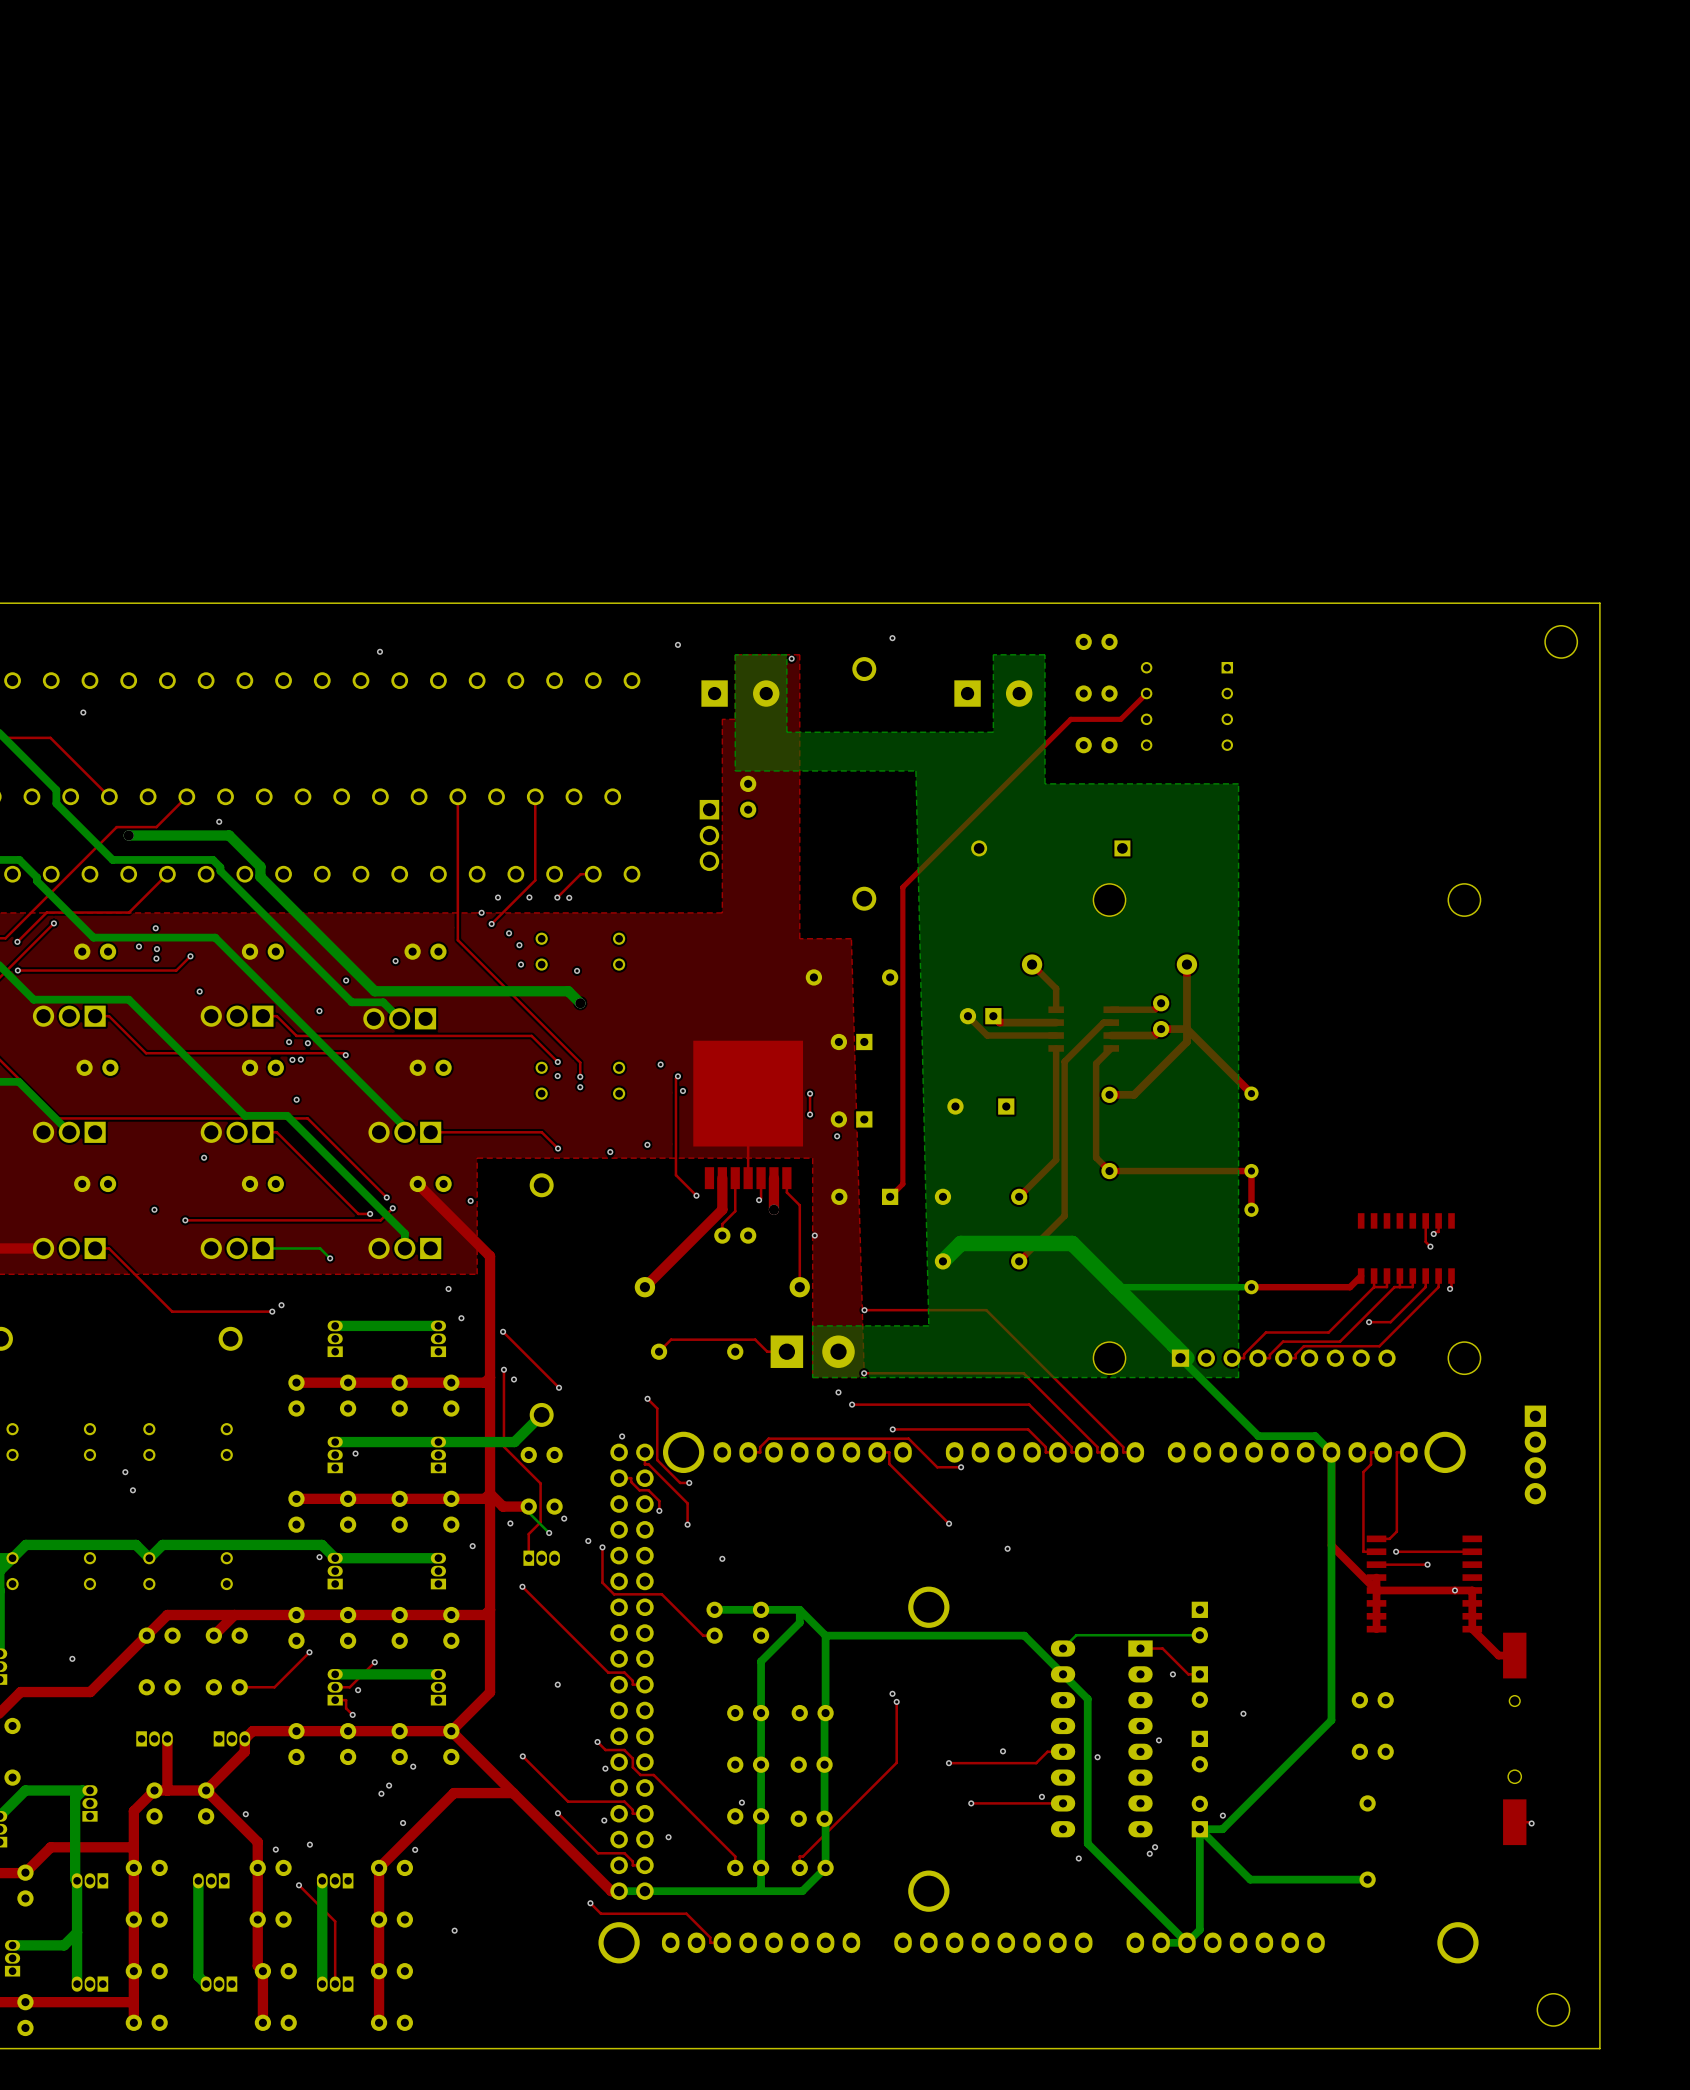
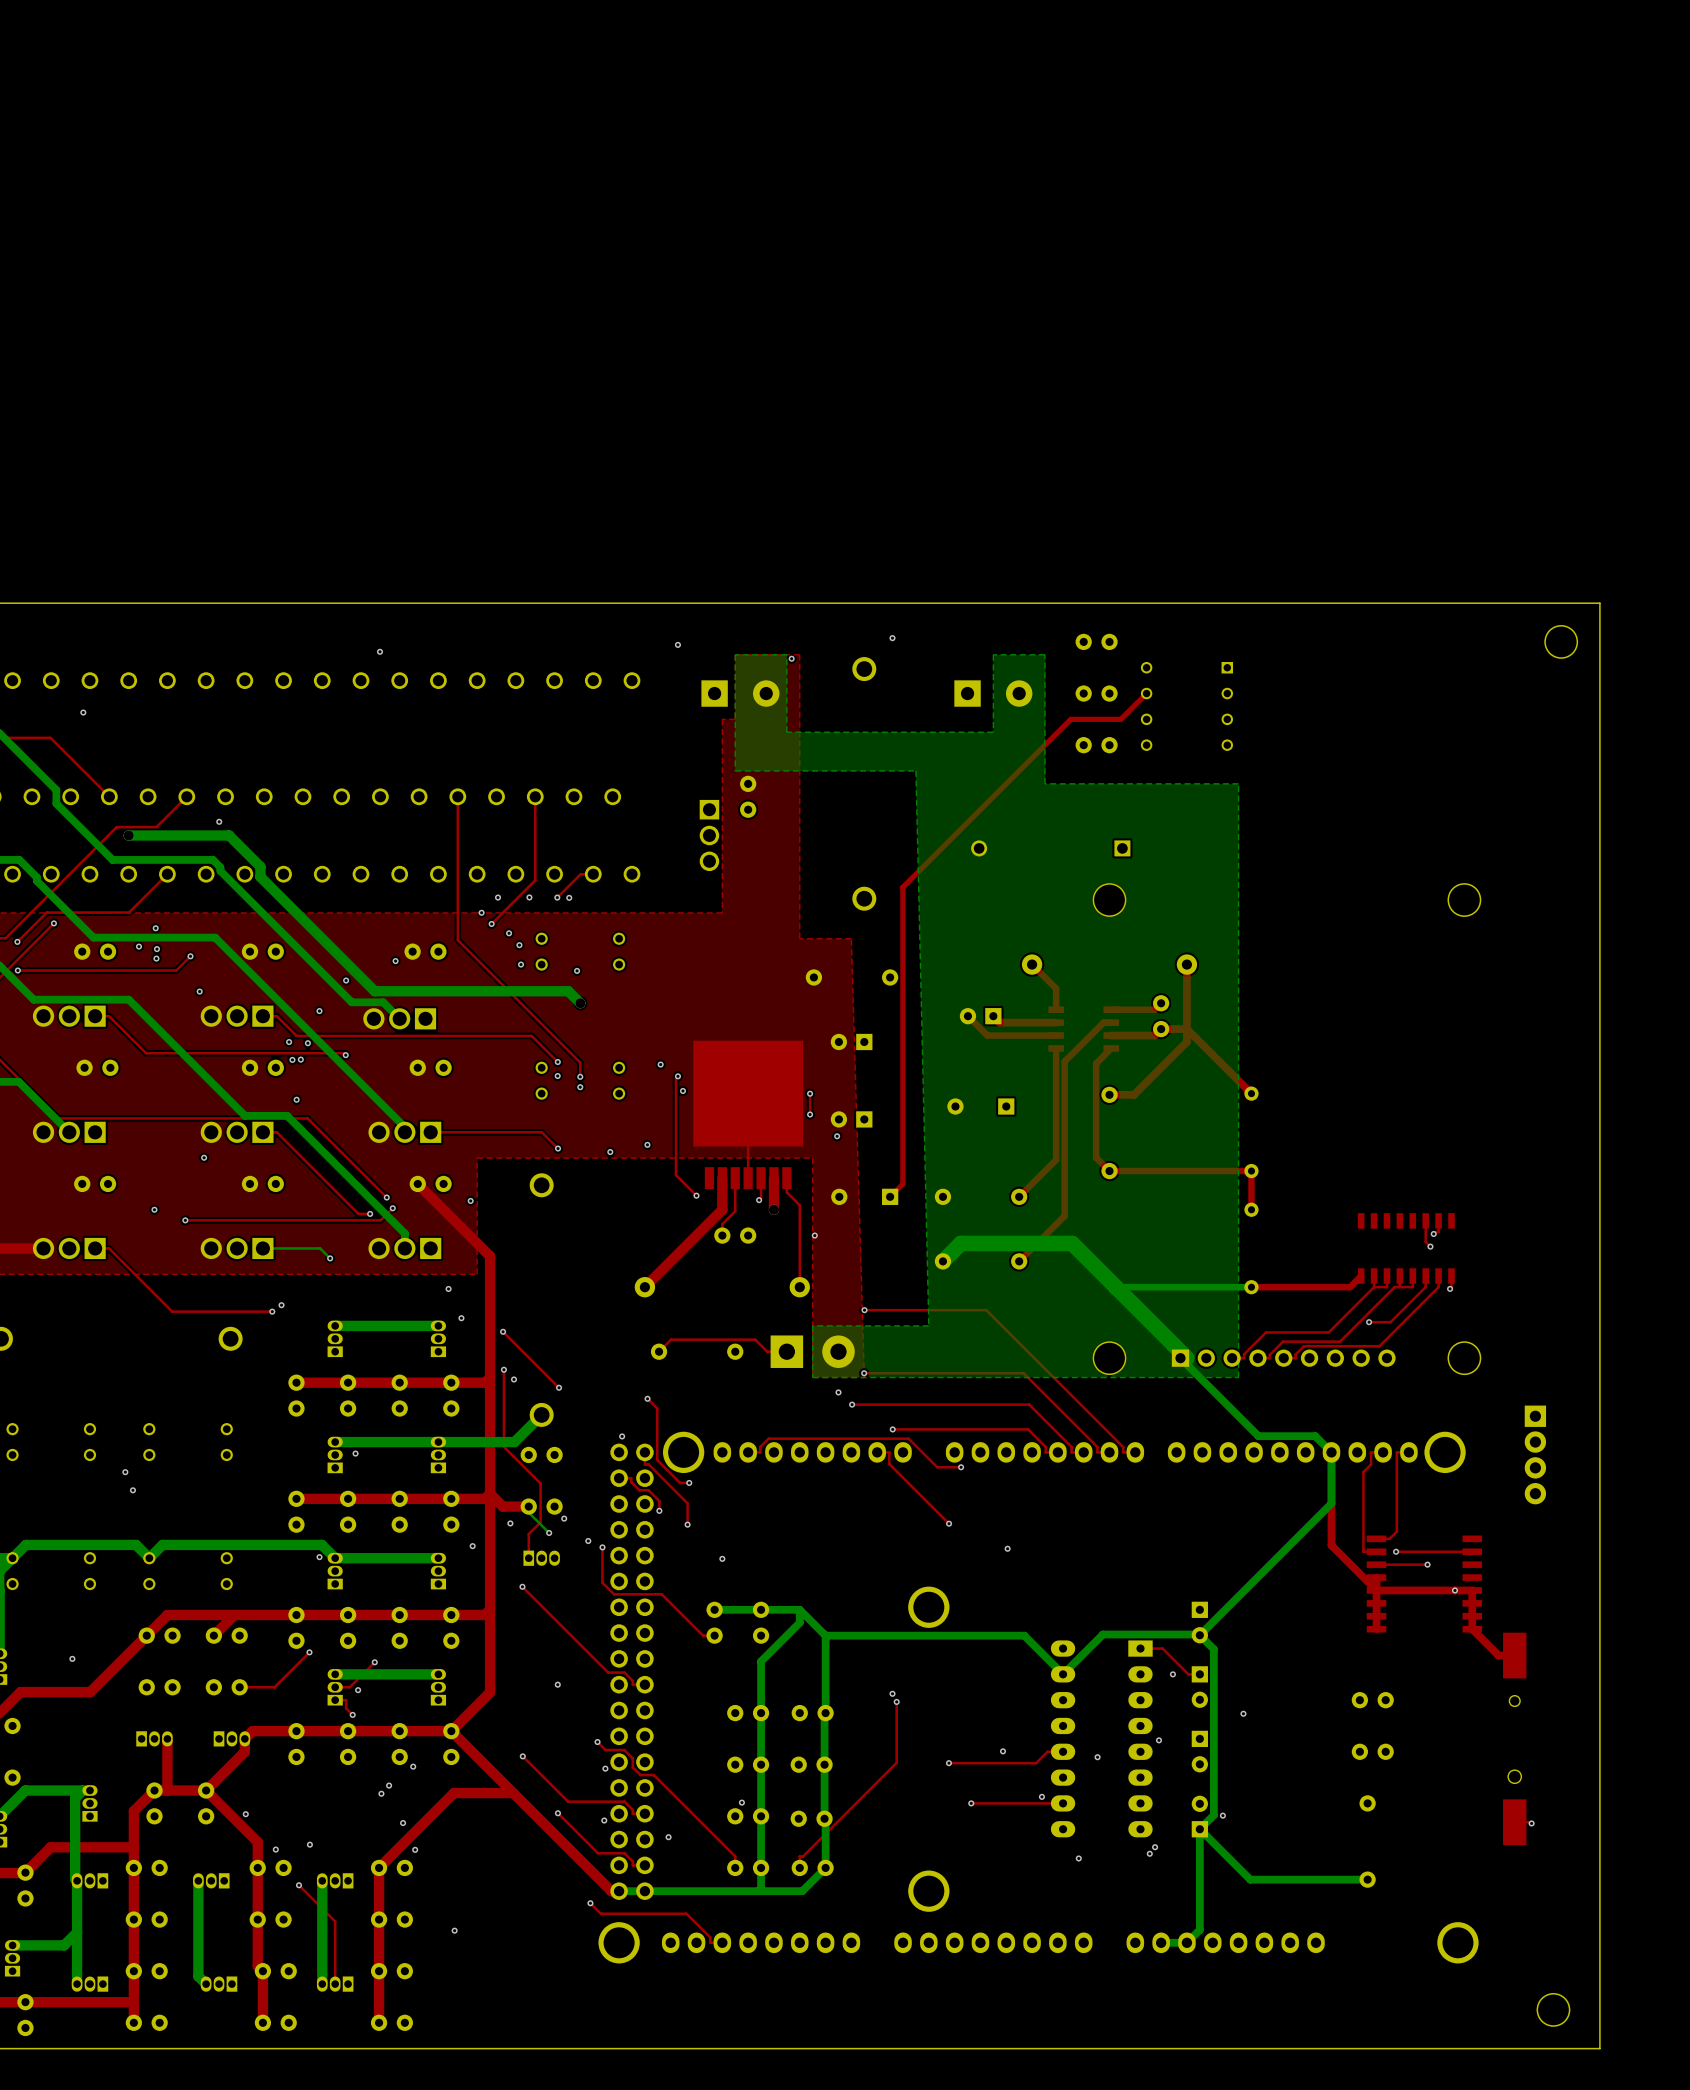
bottom track: (1331, 1503) (1331, 1720) (1222, 1829) (1199, 1829) -> (1331, 1503) (1199, 1635) (1213, 1649) (1213, 1815) (1199, 1829)
bottom track: (1199, 1635) (1076, 1635) (1063, 1648) -> none
bottom track: (1063, 1674) (1087, 1699) (1087, 1843) (1186, 1942) -> (1063, 1674) (1102, 1634) (1199, 1634)

